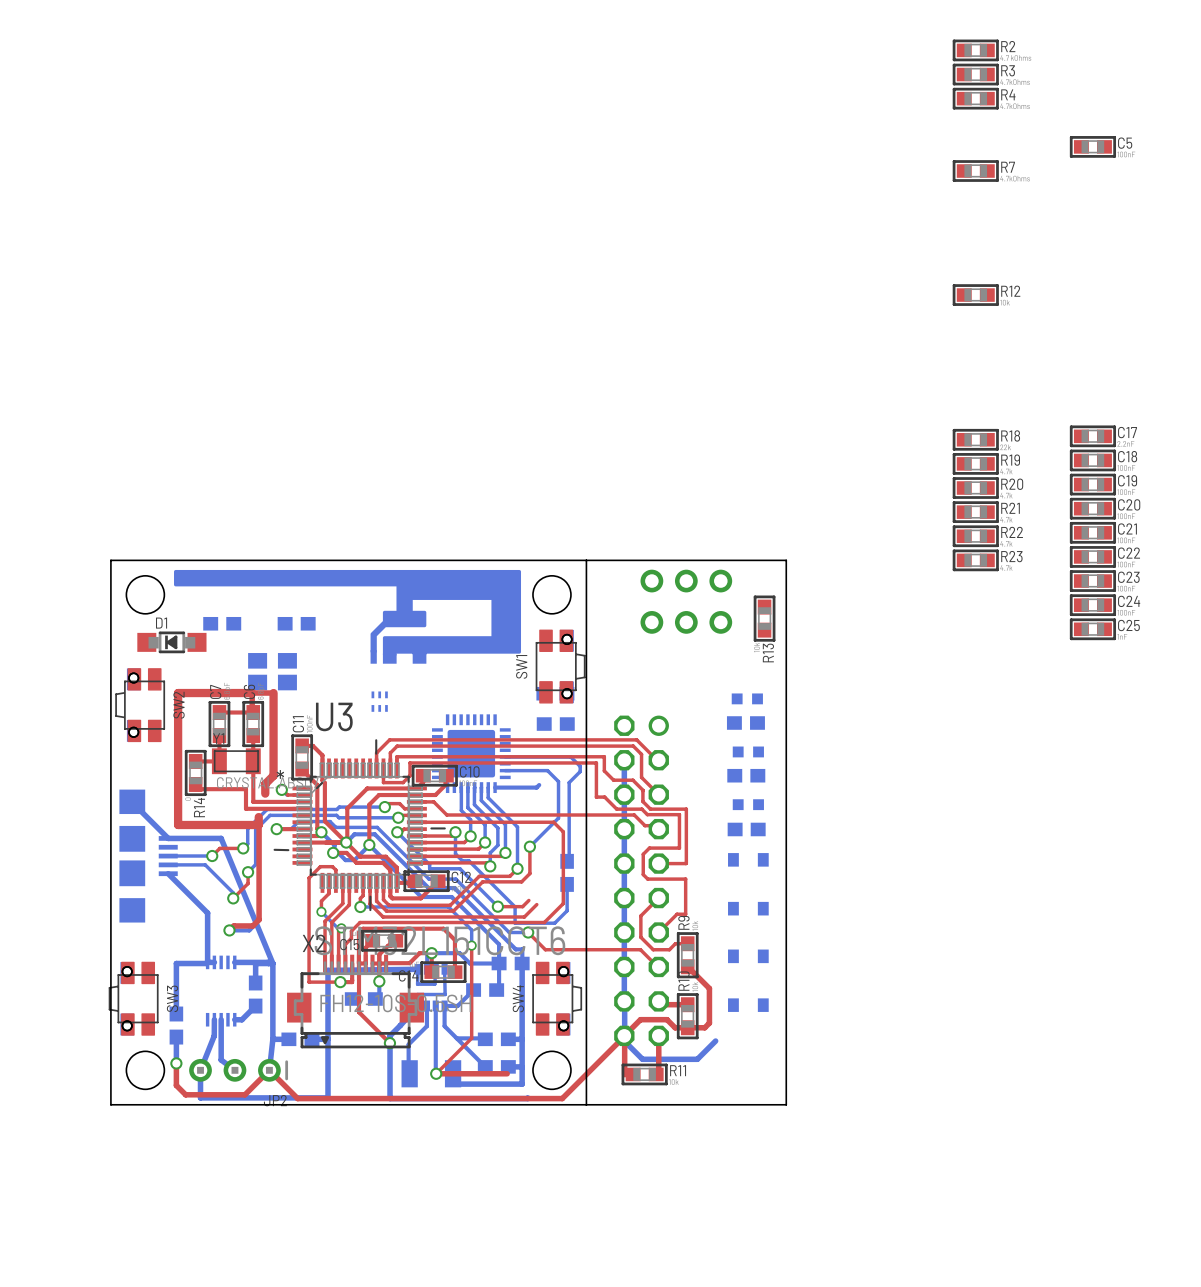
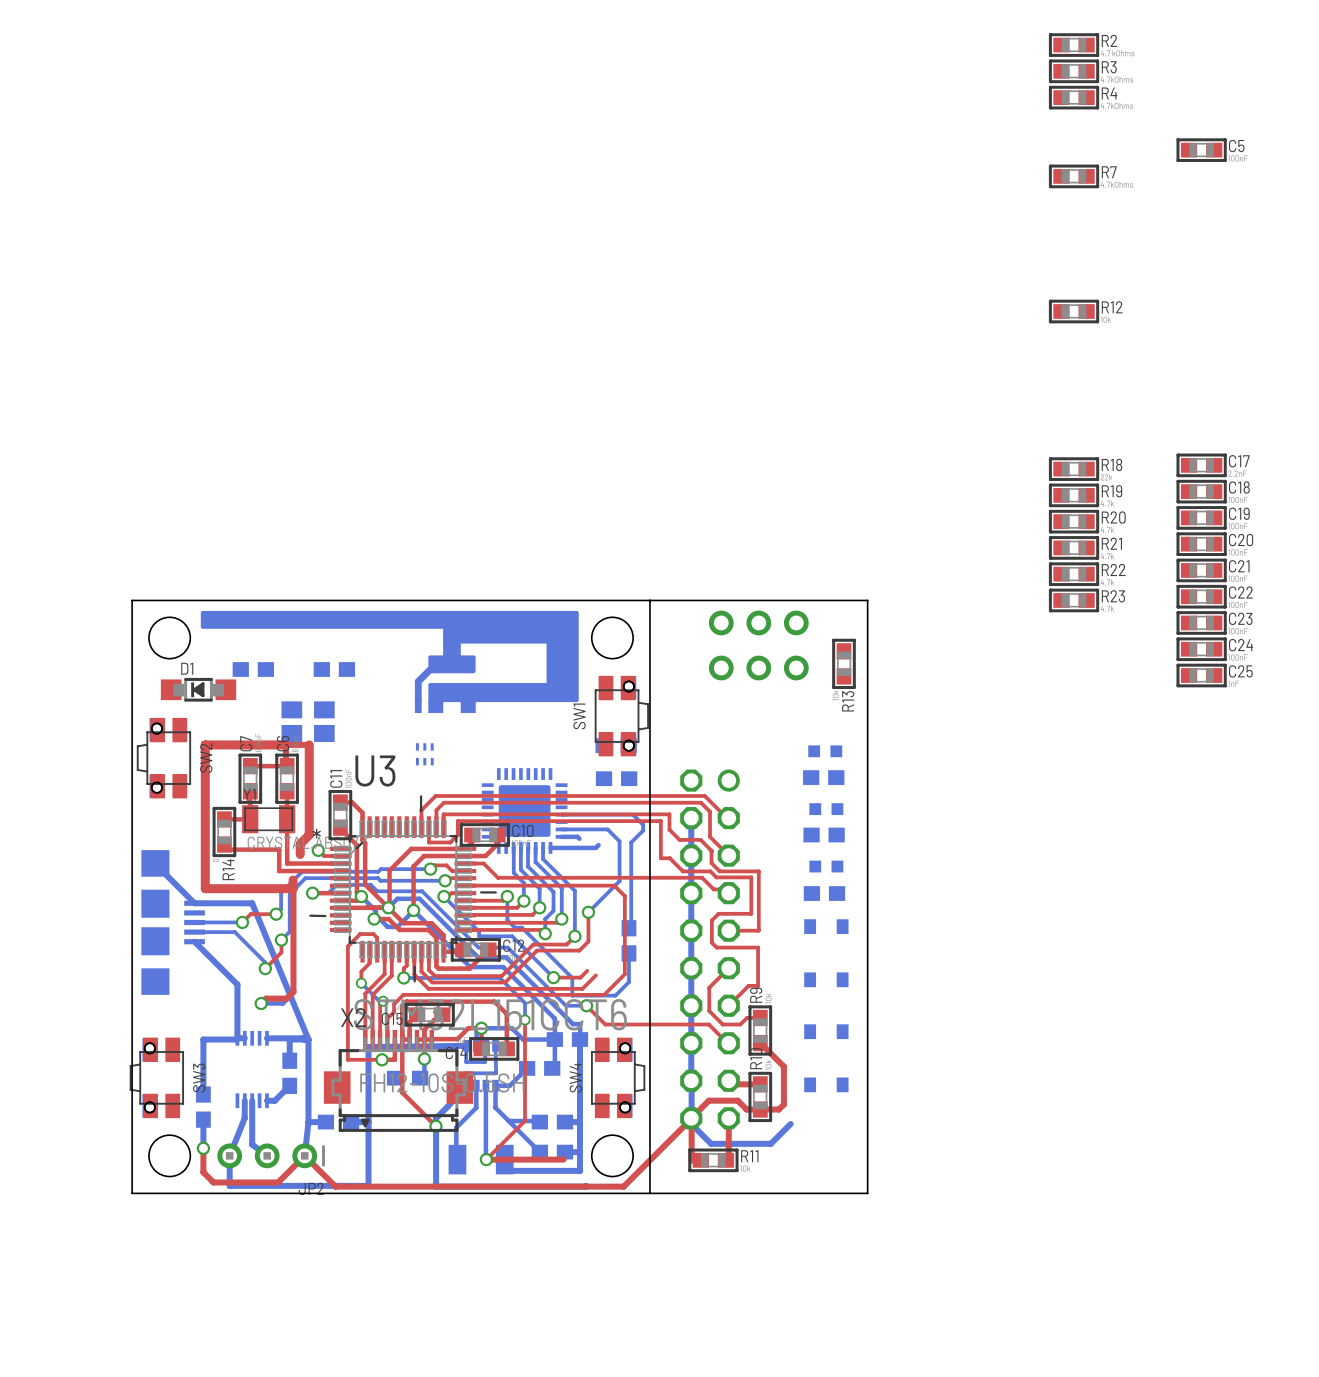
bottom track: none -> (561, 836) (577, 836) (579, 838)

